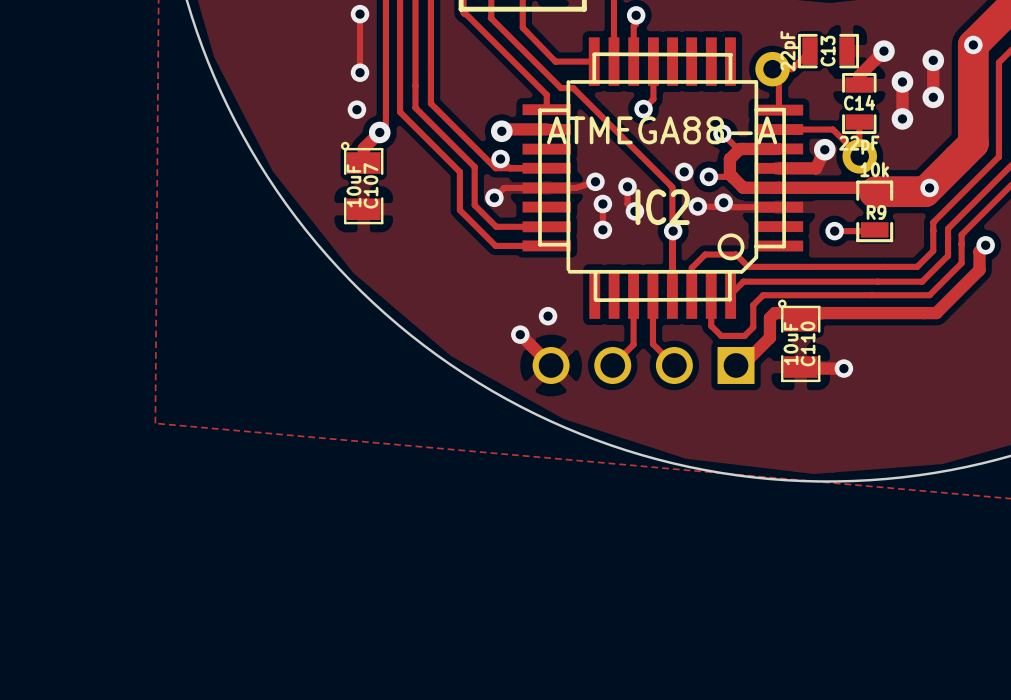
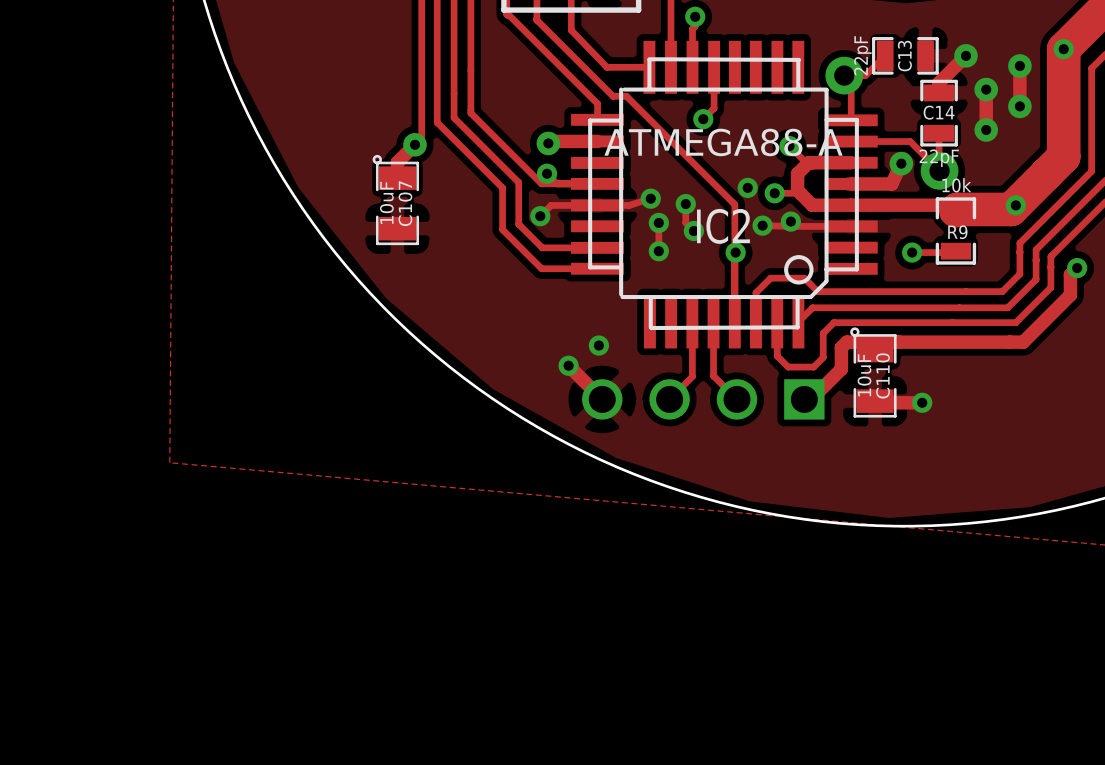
track: (360, 14) (360, 72) -> none
via: (360, 14) -> none
via: (360, 72) -> none
via: (356, 109) -> none

